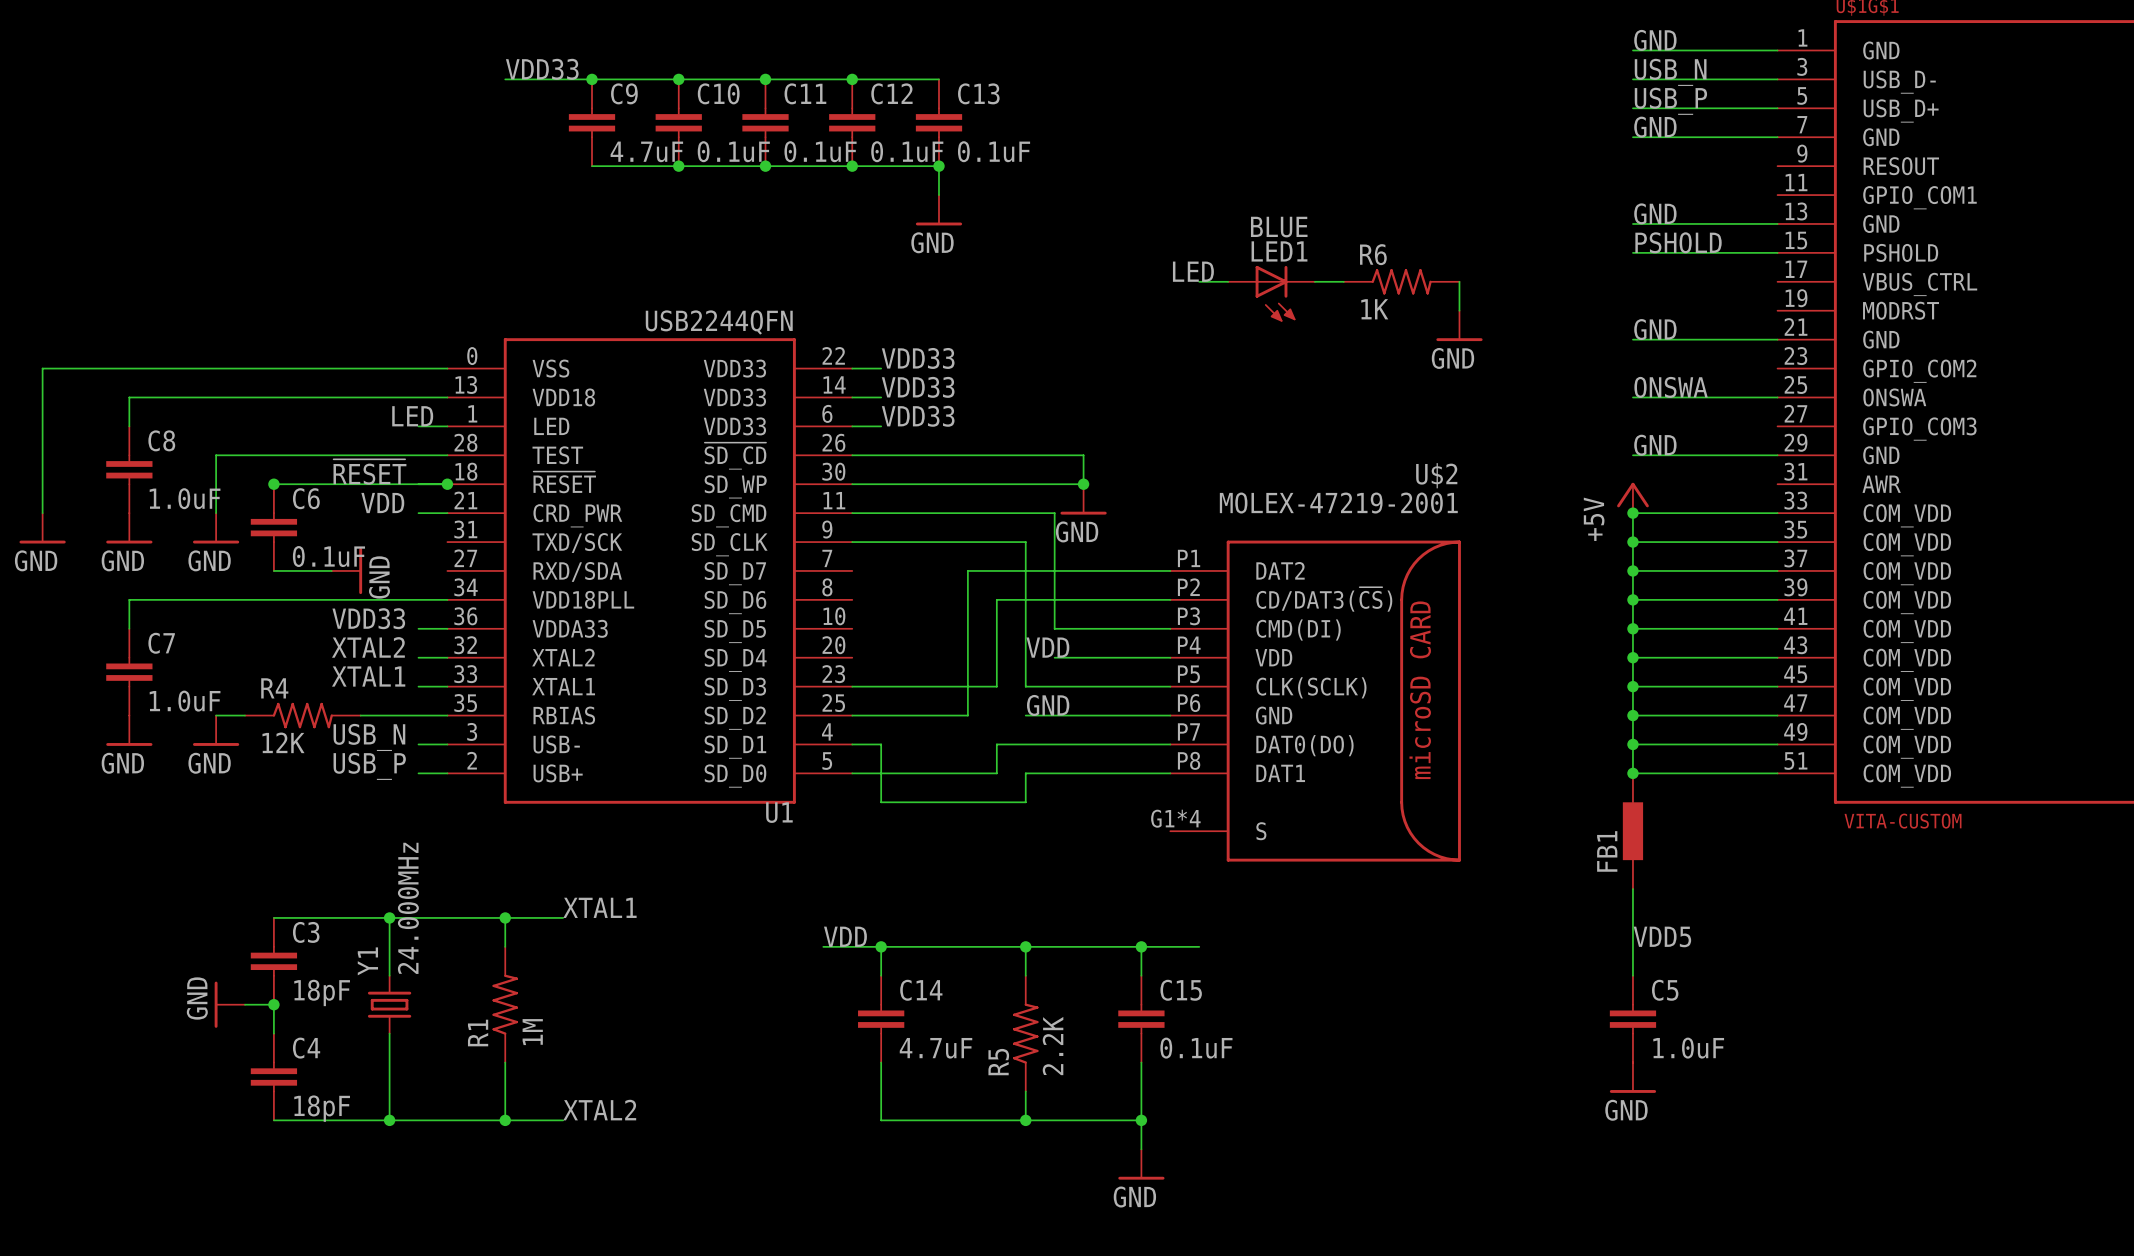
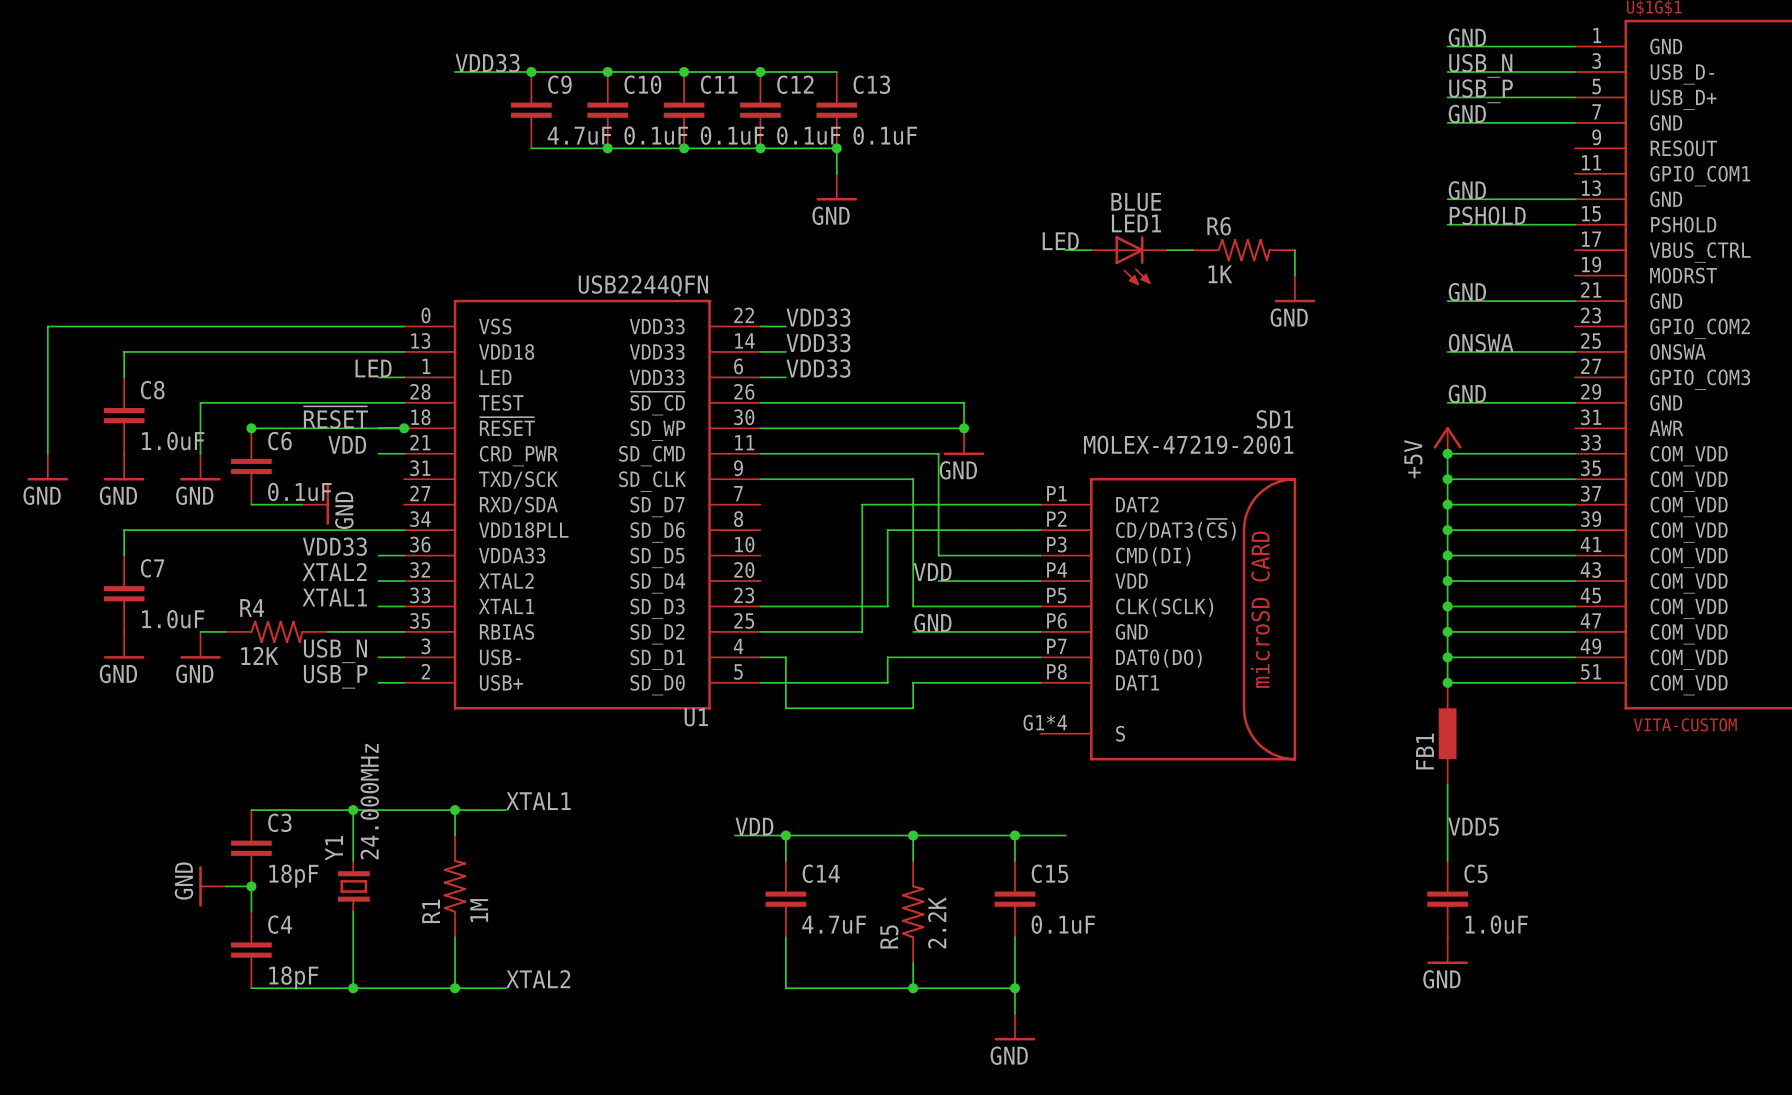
U$2 name: U$2 (1436, 475) -> SD1 (1275, 419)
Y1 symbol: [367, 974, 412, 1035] -> [337, 860, 370, 913]

